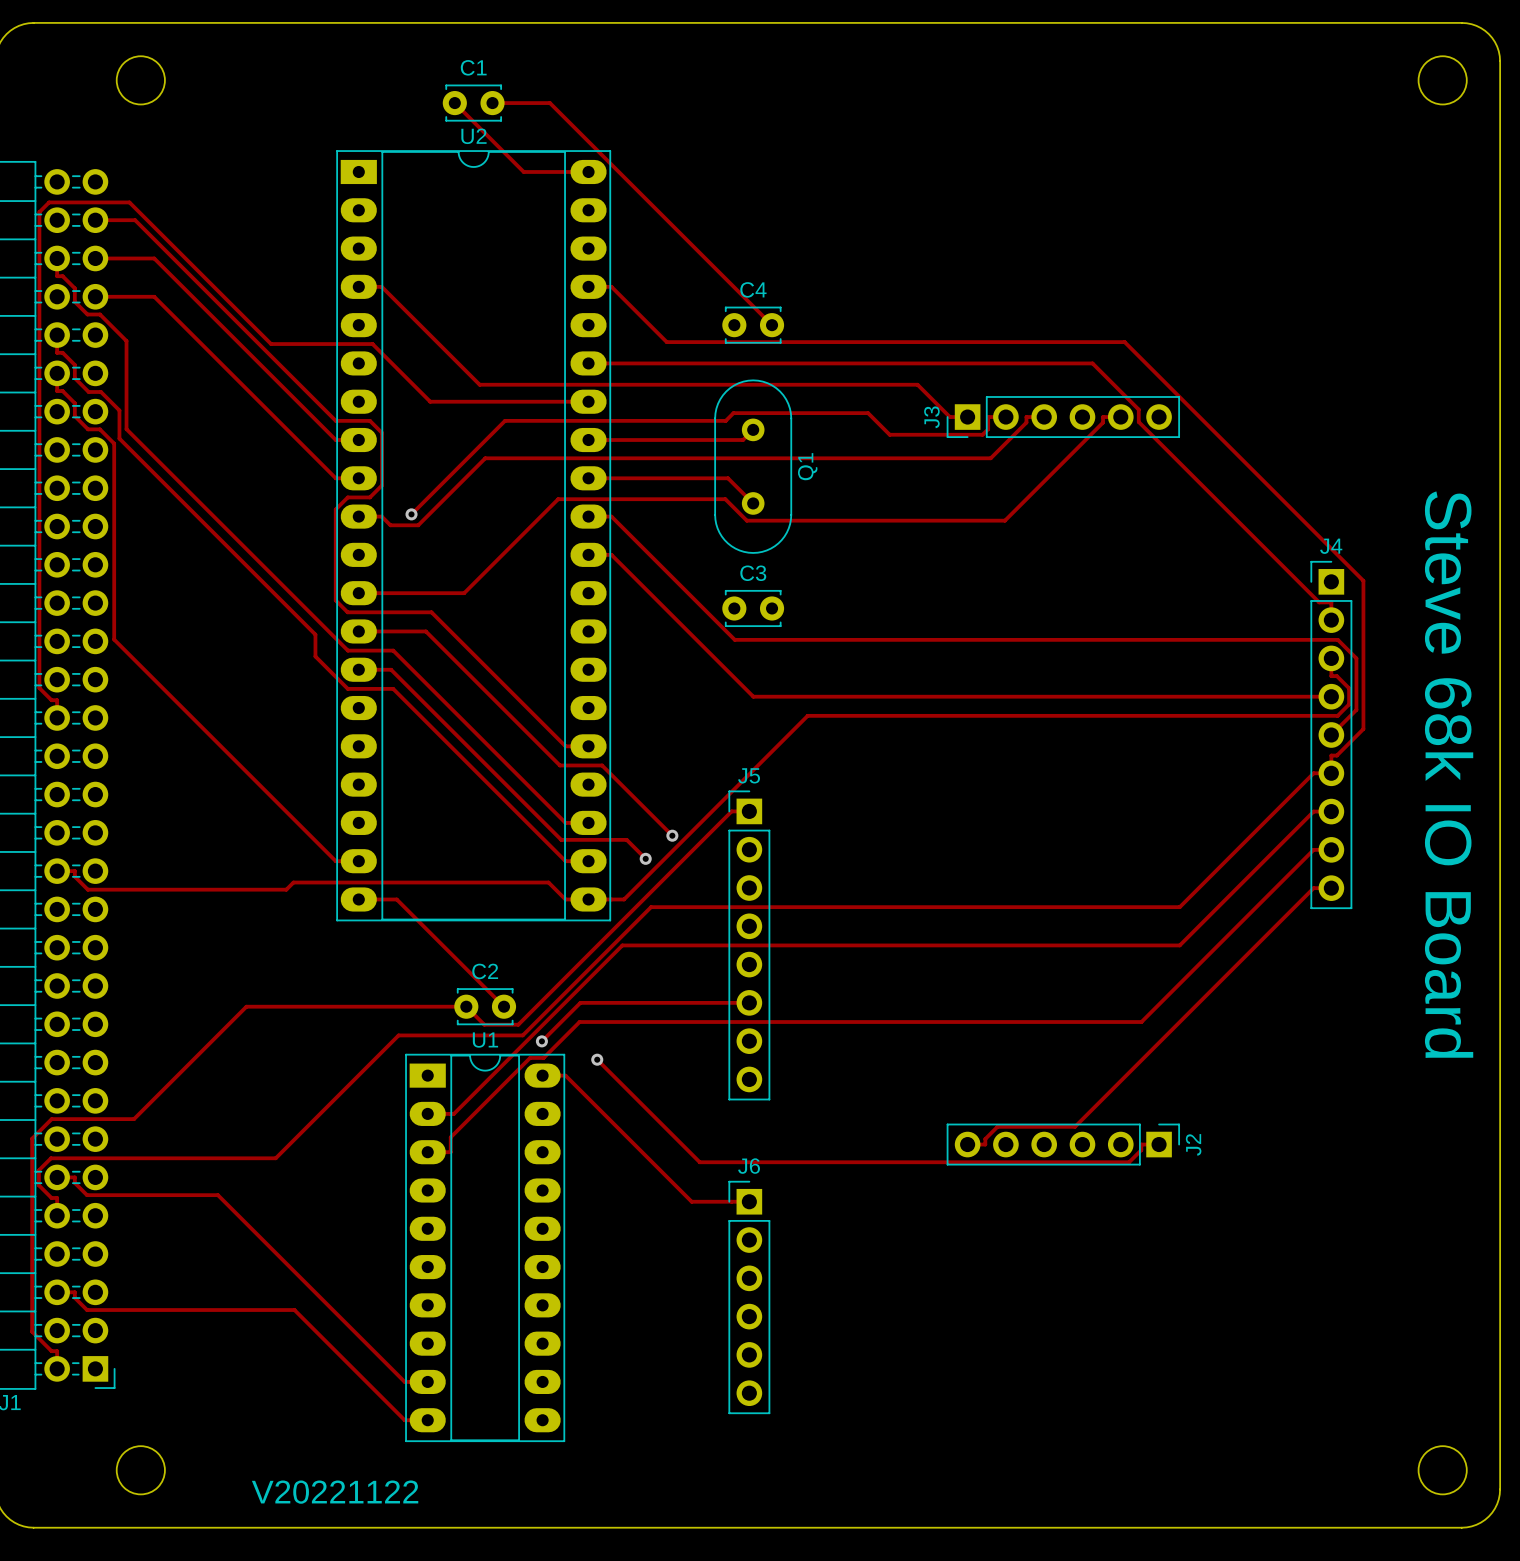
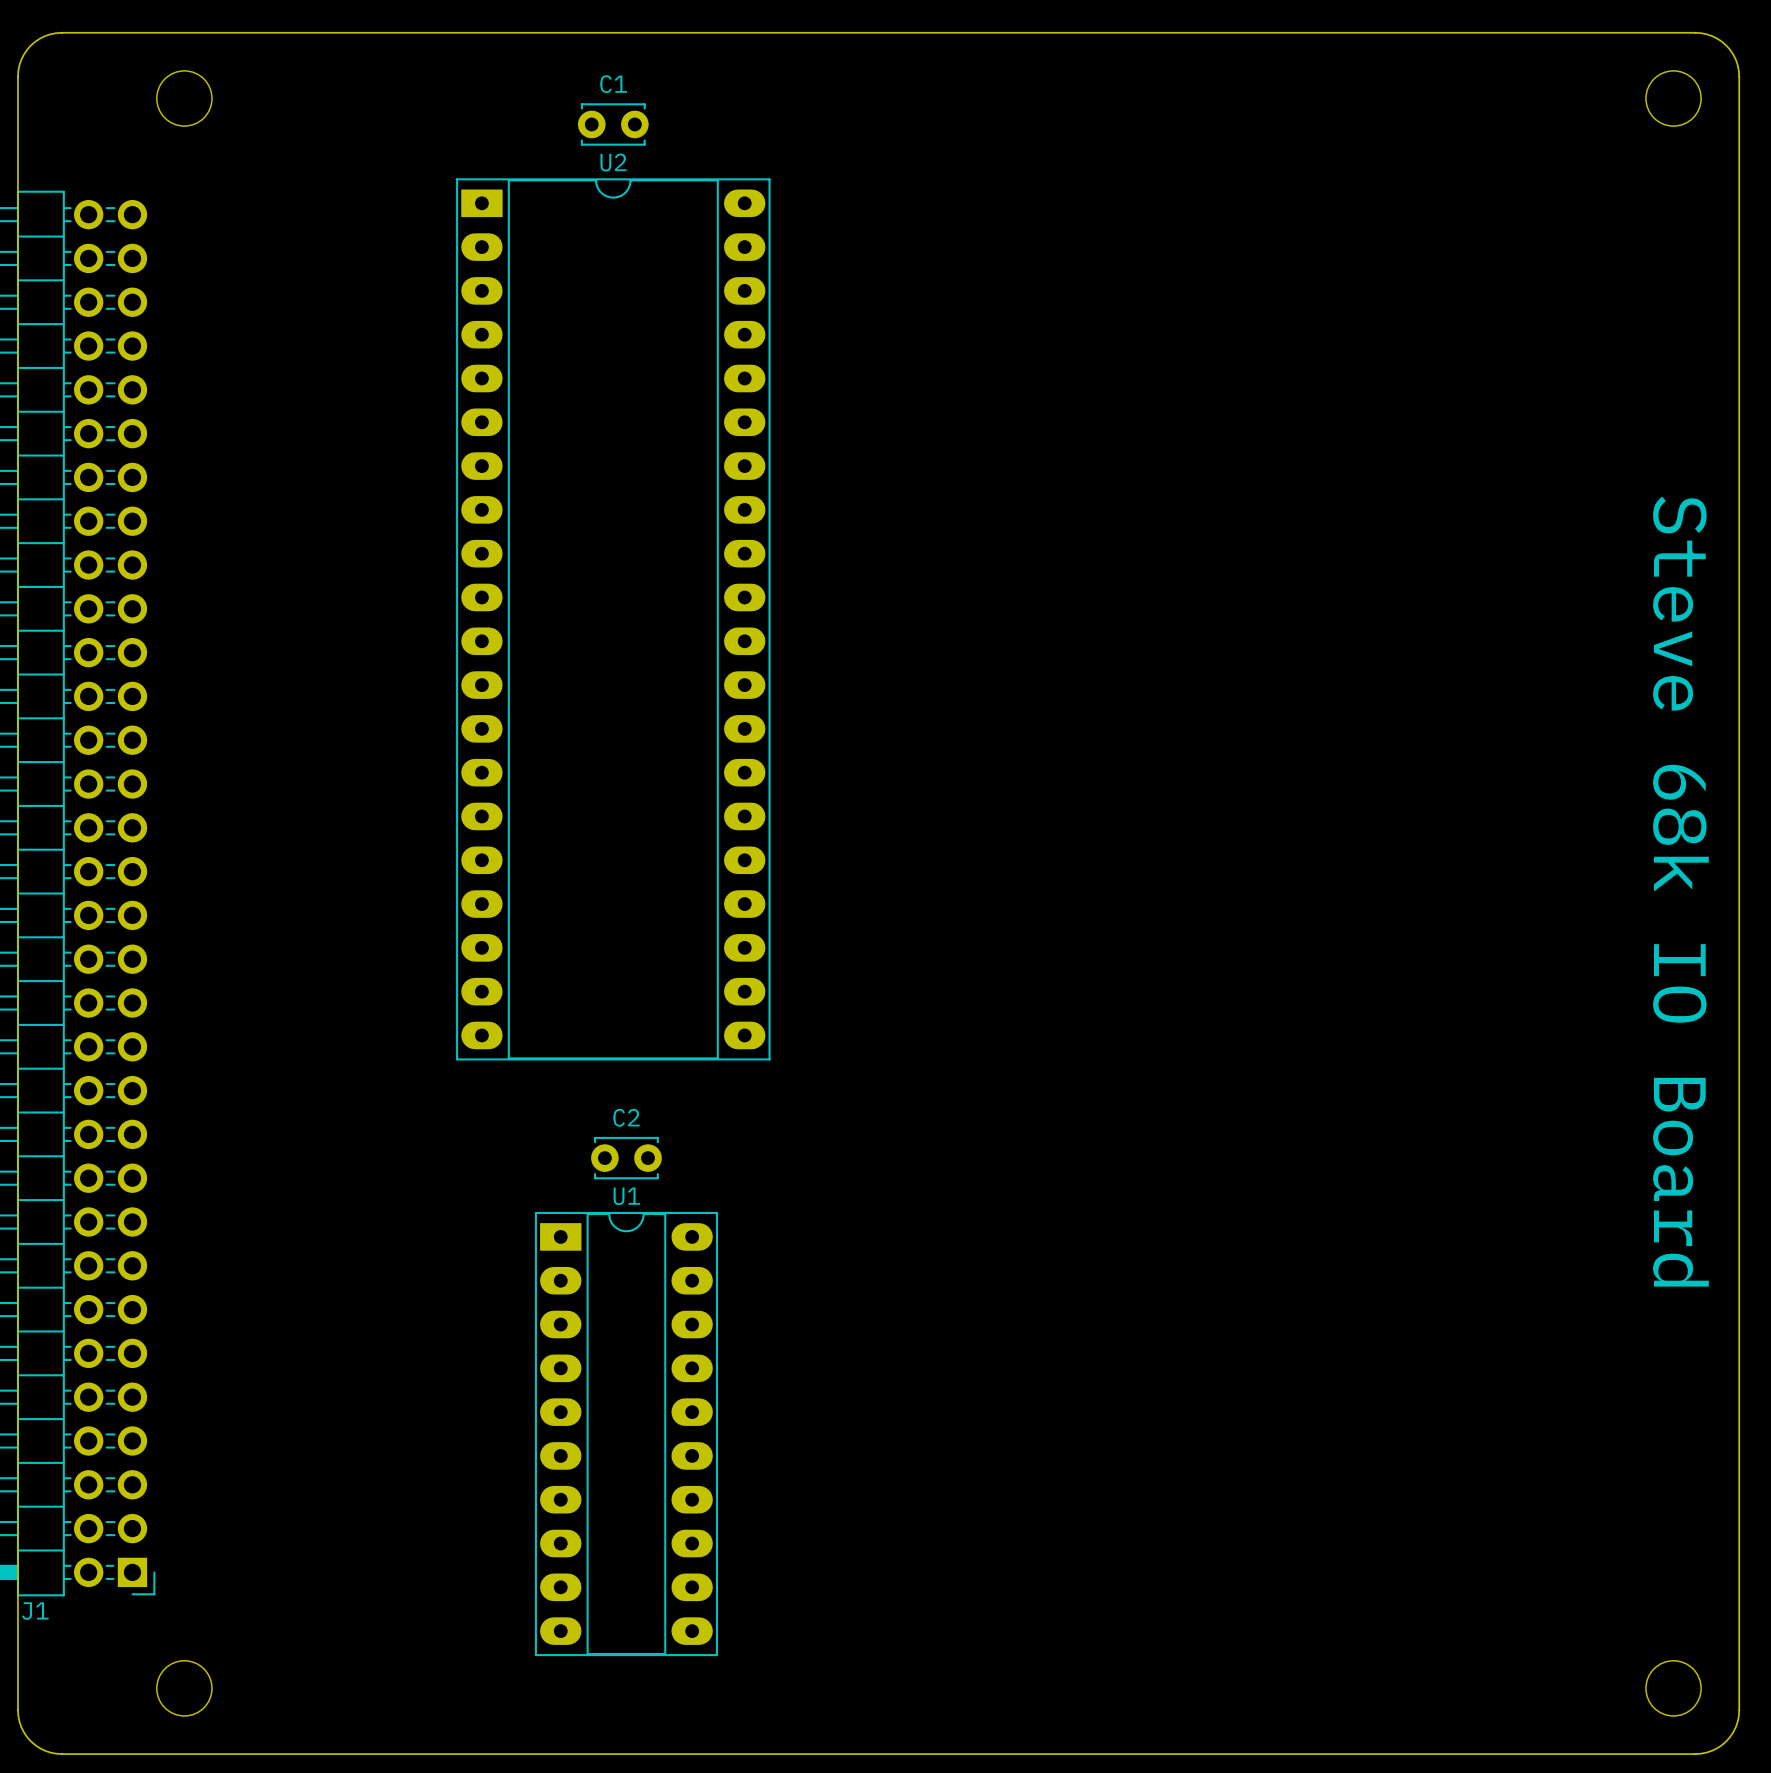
track: (454, 103) (523, 171) (588, 171) -> none
C1 position: (473, 103) -> (613, 124)
track: (492, 103) (549, 103) (772, 325) -> none
track: (95, 220) (135, 220) (335, 420) (369, 420) (382, 432) (382, 485) (369, 497) (347, 497) (335, 509) (335, 600) (347, 612) (431, 612) (565, 746) (588, 746) -> none
track: (57, 258) (57, 276) (62, 276) (74, 288) (74, 301) (87, 314) (100, 314) (126, 341) (126, 429) (347, 650) (393, 650) (565, 822) (588, 822) -> none
track: (95, 258) (154, 258) (335, 440) (358, 440) -> none
track: (358, 286) (381, 286) (479, 384) (917, 384) (949, 417) (967, 417) -> none
track: (588, 286) (611, 286) (666, 342) (1124, 342) (1363, 580) (1363, 729) (1336, 755) (1331, 755) (1331, 773) (1313, 773) (1179, 907) (651, 907) (522, 1035) (398, 1035) (275, 1158) (50, 1158) (38, 1170) (38, 1185) (51, 1198) (57, 1198) (57, 1215) -> none
track: (95, 296) (154, 296) (335, 478) (358, 478) -> none
C4: (753, 325) -> none
track: (57, 335) (57, 352) (62, 352) (74, 364) (74, 378) (88, 392) (100, 392) (119, 410) (119, 438) (315, 634) (315, 656) (347, 688) (393, 688) (565, 861) (588, 861) -> none
track: (588, 363) (1092, 363) (1138, 409) (1138, 422) (1319, 602) (1331, 602) (1331, 620) -> none
track: (57, 373) (57, 391) (62, 391) (74, 403) (74, 416) (88, 429) (99, 429) (114, 443) (114, 639) (335, 861) (358, 861) -> none
track: (588, 401) (430, 401) (372, 344) (271, 344) (129, 202) (49, 202) (39, 212) (39, 688) (51, 700) (57, 700) (57, 717) -> none
track: (1005, 417) (988, 417) (988, 429) (982, 434) (889, 434) (868, 413) (733, 413) (725, 420) (505, 420) (411, 514) -> none
track: (1044, 417) (1026, 417) (1026, 422) (990, 458) (485, 458) (418, 525) (390, 525) (381, 516) (358, 516) -> none
J3: (1063, 417) -> none
track: (1120, 417) (1103, 417) (1103, 422) (1004, 520) (746, 520) (725, 499) (558, 499) (464, 593) (358, 593) -> none
track: (753, 429) (743, 440) (588, 440) -> none
Q1: (753, 466) -> none
track: (588, 478) (728, 478) (753, 503) -> none
via: (411, 514) -> none
track: (588, 516) (611, 516) (734, 639) (1337, 639) (1356, 658) (1356, 709) (1331, 734) -> none
U2 position: (473, 535) -> (613, 619)
track: (588, 554) (611, 554) (753, 696) (1331, 696) -> none
C3: (753, 608) -> none
track: (358, 631) (425, 631) (559, 765) (602, 765) (672, 835) -> none
track: (1331, 658) (1331, 676) (1336, 676) (1349, 688) (1349, 704) (1337, 715) (807, 715) (624, 899) (565, 899) (548, 882) (293, 882) (286, 889) (87, 889) (74, 876) (74, 871) (57, 871) -> none
track: (358, 669) (391, 669) (561, 839) (626, 839) (645, 858) -> none
J4: (1331, 734) -> none
track: (749, 811) (731, 811) (518, 1024) (484, 1024) (466, 1006) (246, 1006) (134, 1119) (51, 1119) (32, 1138) (32, 1331) (51, 1351) (57, 1351) (57, 1368) -> none
track: (1331, 811) (1313, 811) (1179, 945) (622, 945) (453, 1113) (427, 1113) -> none
via: (672, 835) -> none
track: (1331, 849) (1313, 849) (1141, 1022) (579, 1022) (543, 1057) (530, 1057) (450, 1137) (450, 1152) (427, 1152) -> none
via: (645, 858) -> none
track: (1331, 888) (1313, 888) (1074, 1126) (997, 1126) (985, 1139) (985, 1144) (967, 1144) -> none
track: (358, 899) (396, 899) (504, 1006) -> none
J5: (749, 945) -> none
track: (749, 1002) (580, 1002) (541, 1041) -> none
C2 position: (485, 1006) -> (626, 1158)
via: (541, 1041) -> none
track: (597, 1059) (699, 1162) (1129, 1162) (1141, 1150) (1141, 1144) (1159, 1144) -> none
via: (597, 1059) -> none
track: (542, 1075) (565, 1075) (691, 1201) (749, 1201) -> none
J2: (1063, 1144) -> none
track: (57, 1177) (74, 1177) (74, 1182) (87, 1195) (217, 1195) (404, 1381) (427, 1381) -> none
U1 position: (485, 1247) -> (626, 1434)
track: (57, 1292) (74, 1292) (74, 1297) (87, 1310) (294, 1310) (404, 1420) (427, 1420) -> none
J6: (749, 1297) -> none
text: V20221122 (335, 1492) -> none

